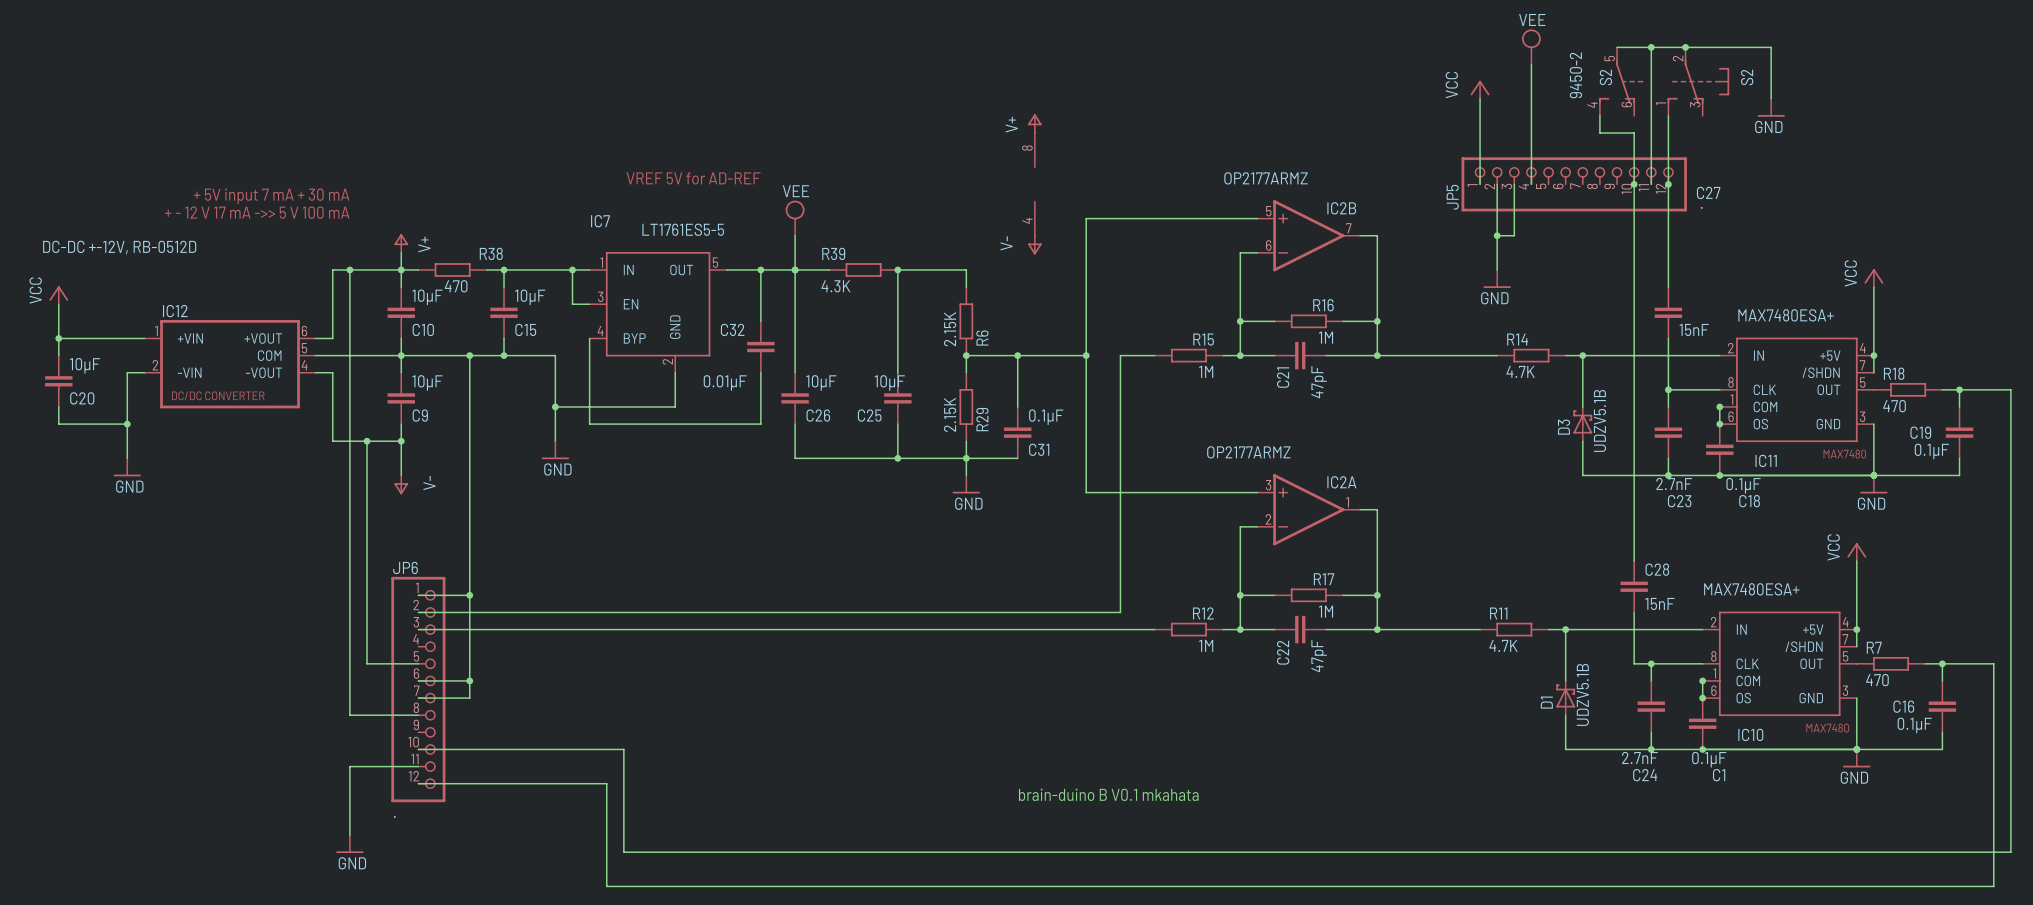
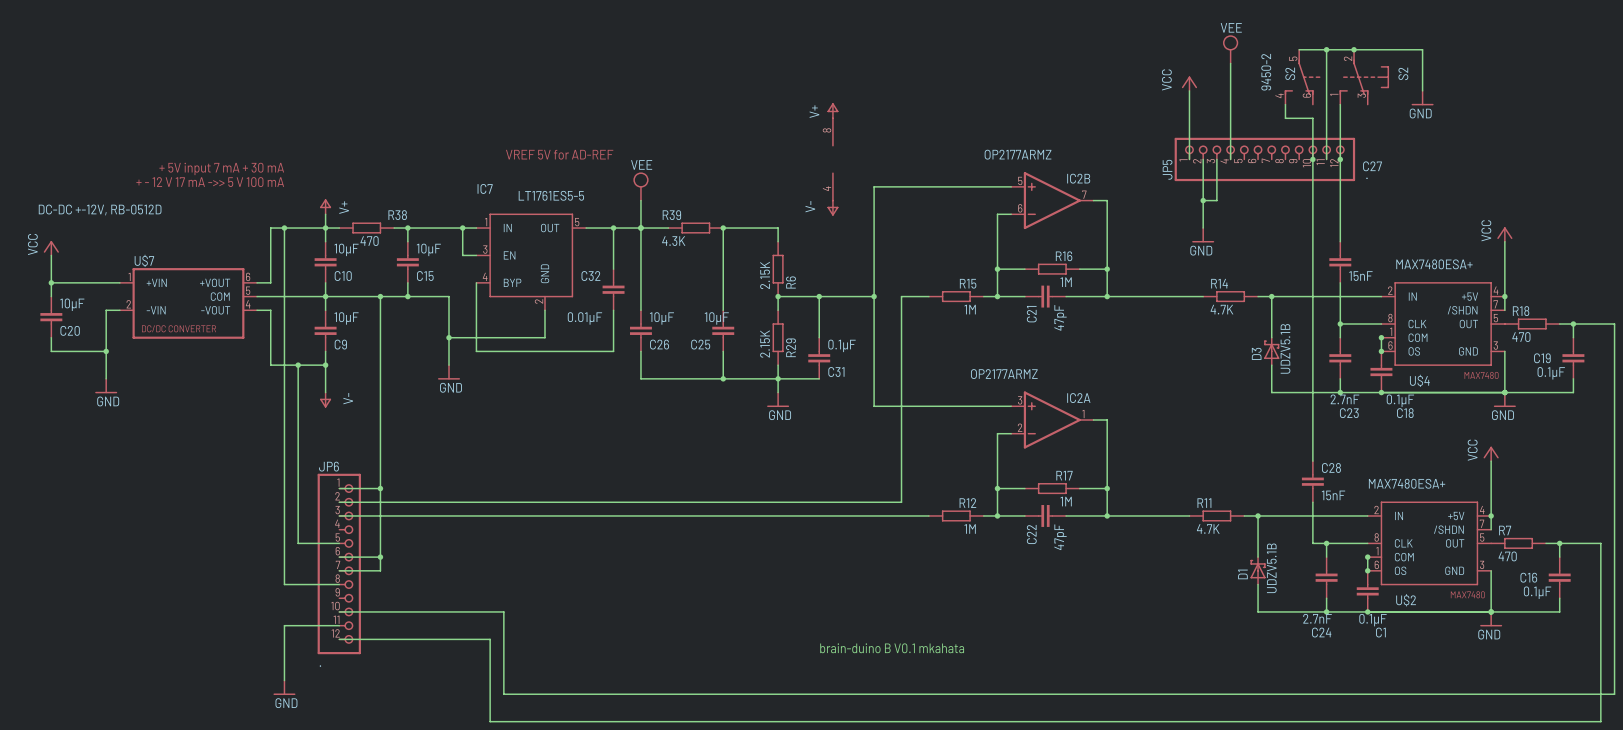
IC12 name: IC12 (175, 311) -> U$7 (144, 260)
IC11 name: IC11 (1766, 460) -> U$4 (1419, 380)
IC10 name: IC10 (1750, 734) -> U$2 (1406, 600)

